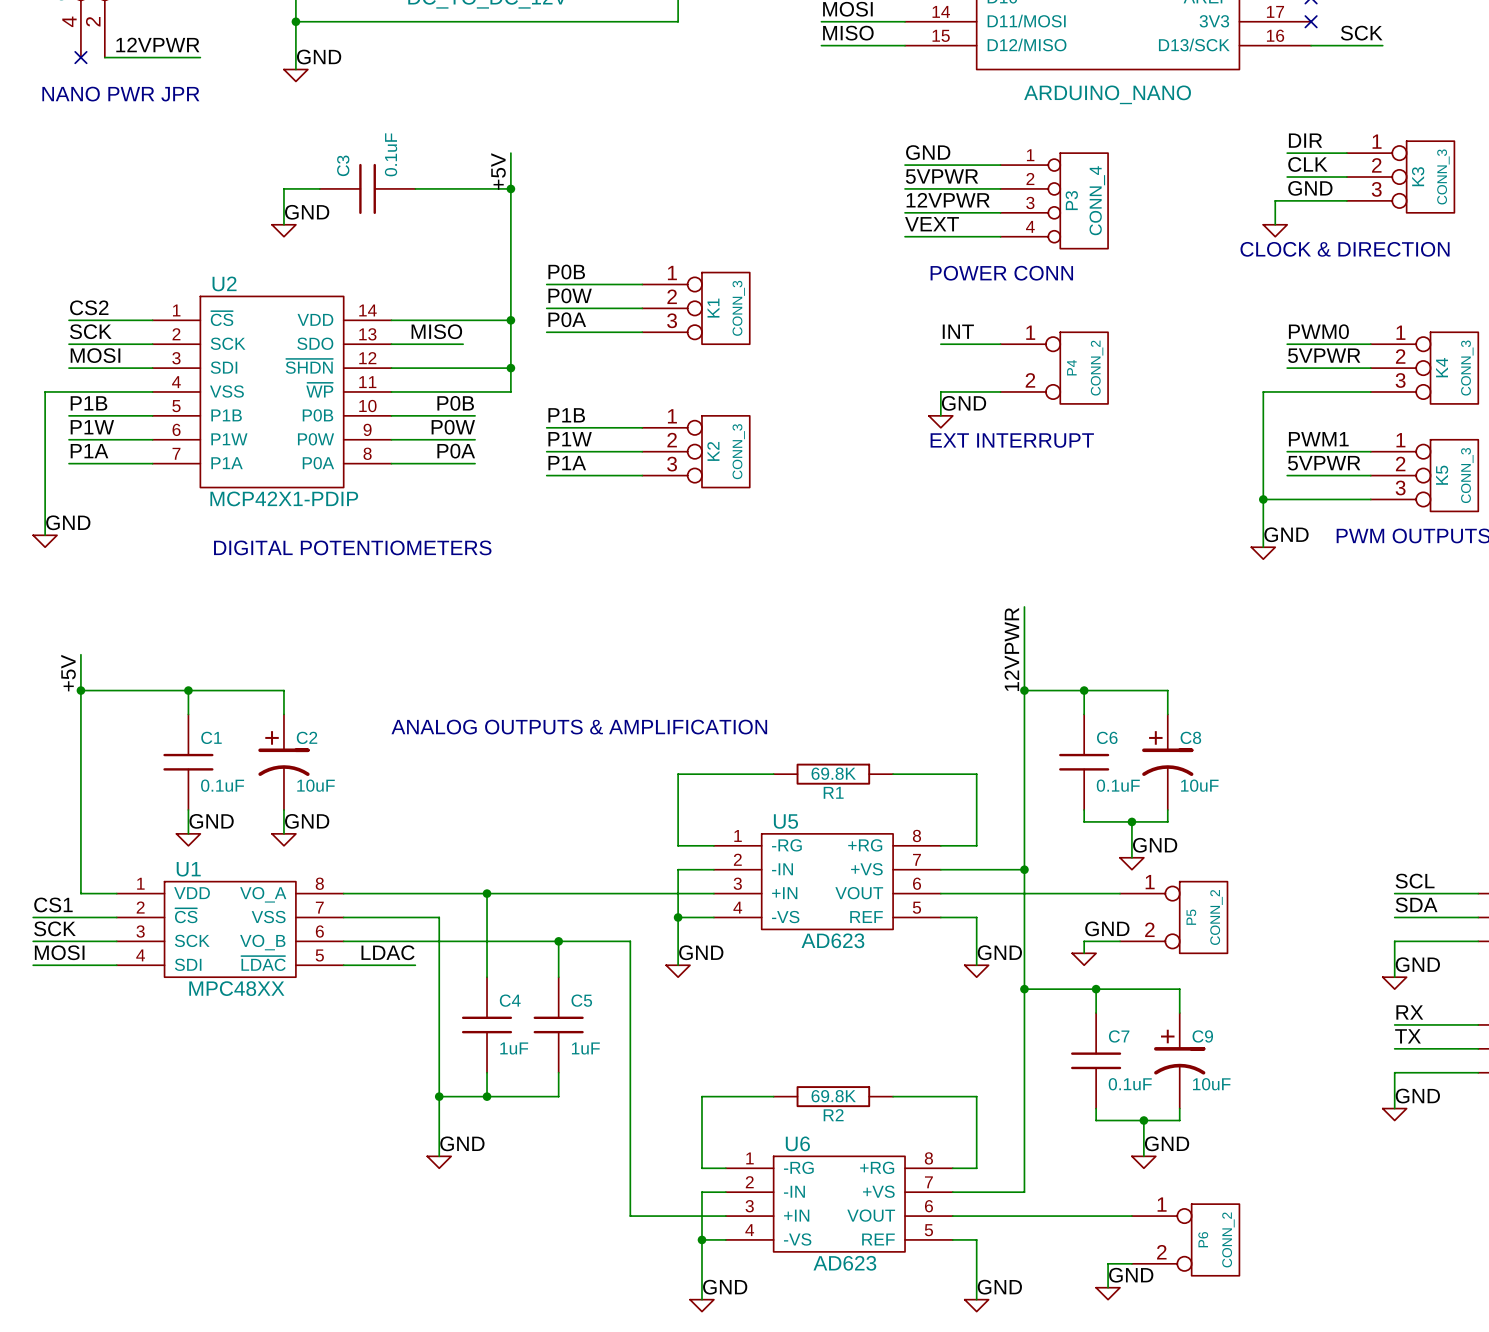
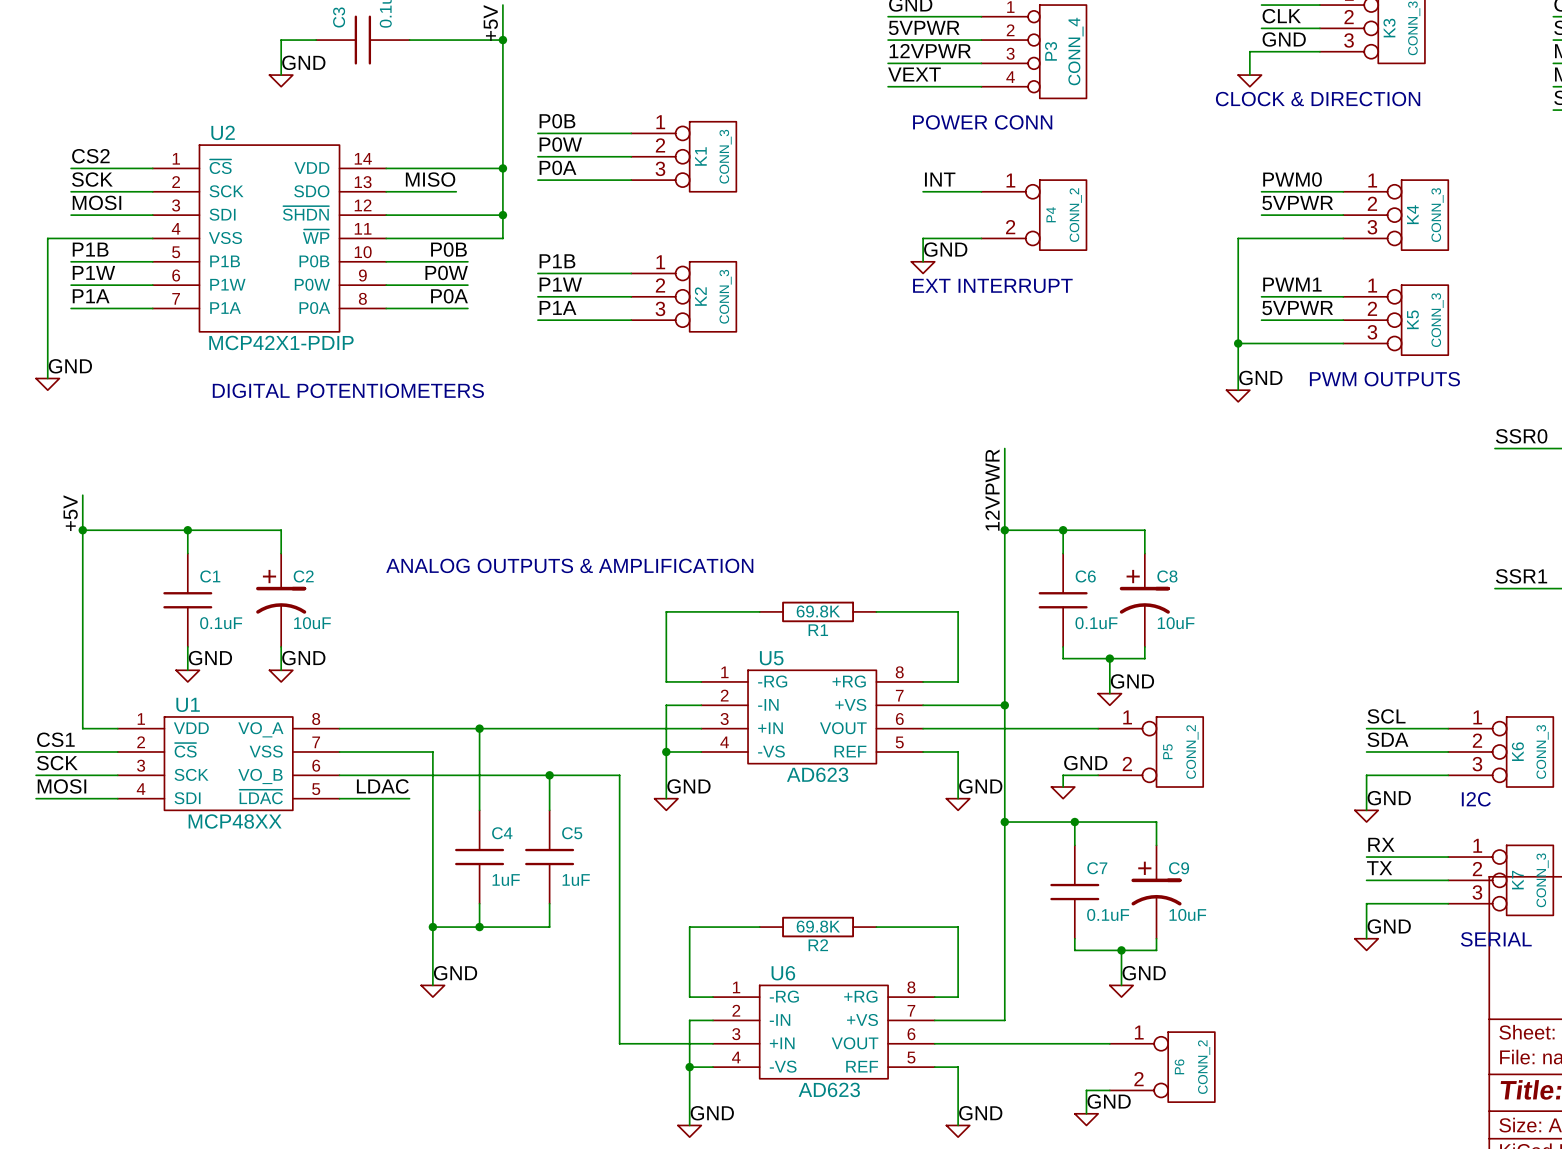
U1 value: MPC48XX (236, 988) -> MCP48XX (235, 821)

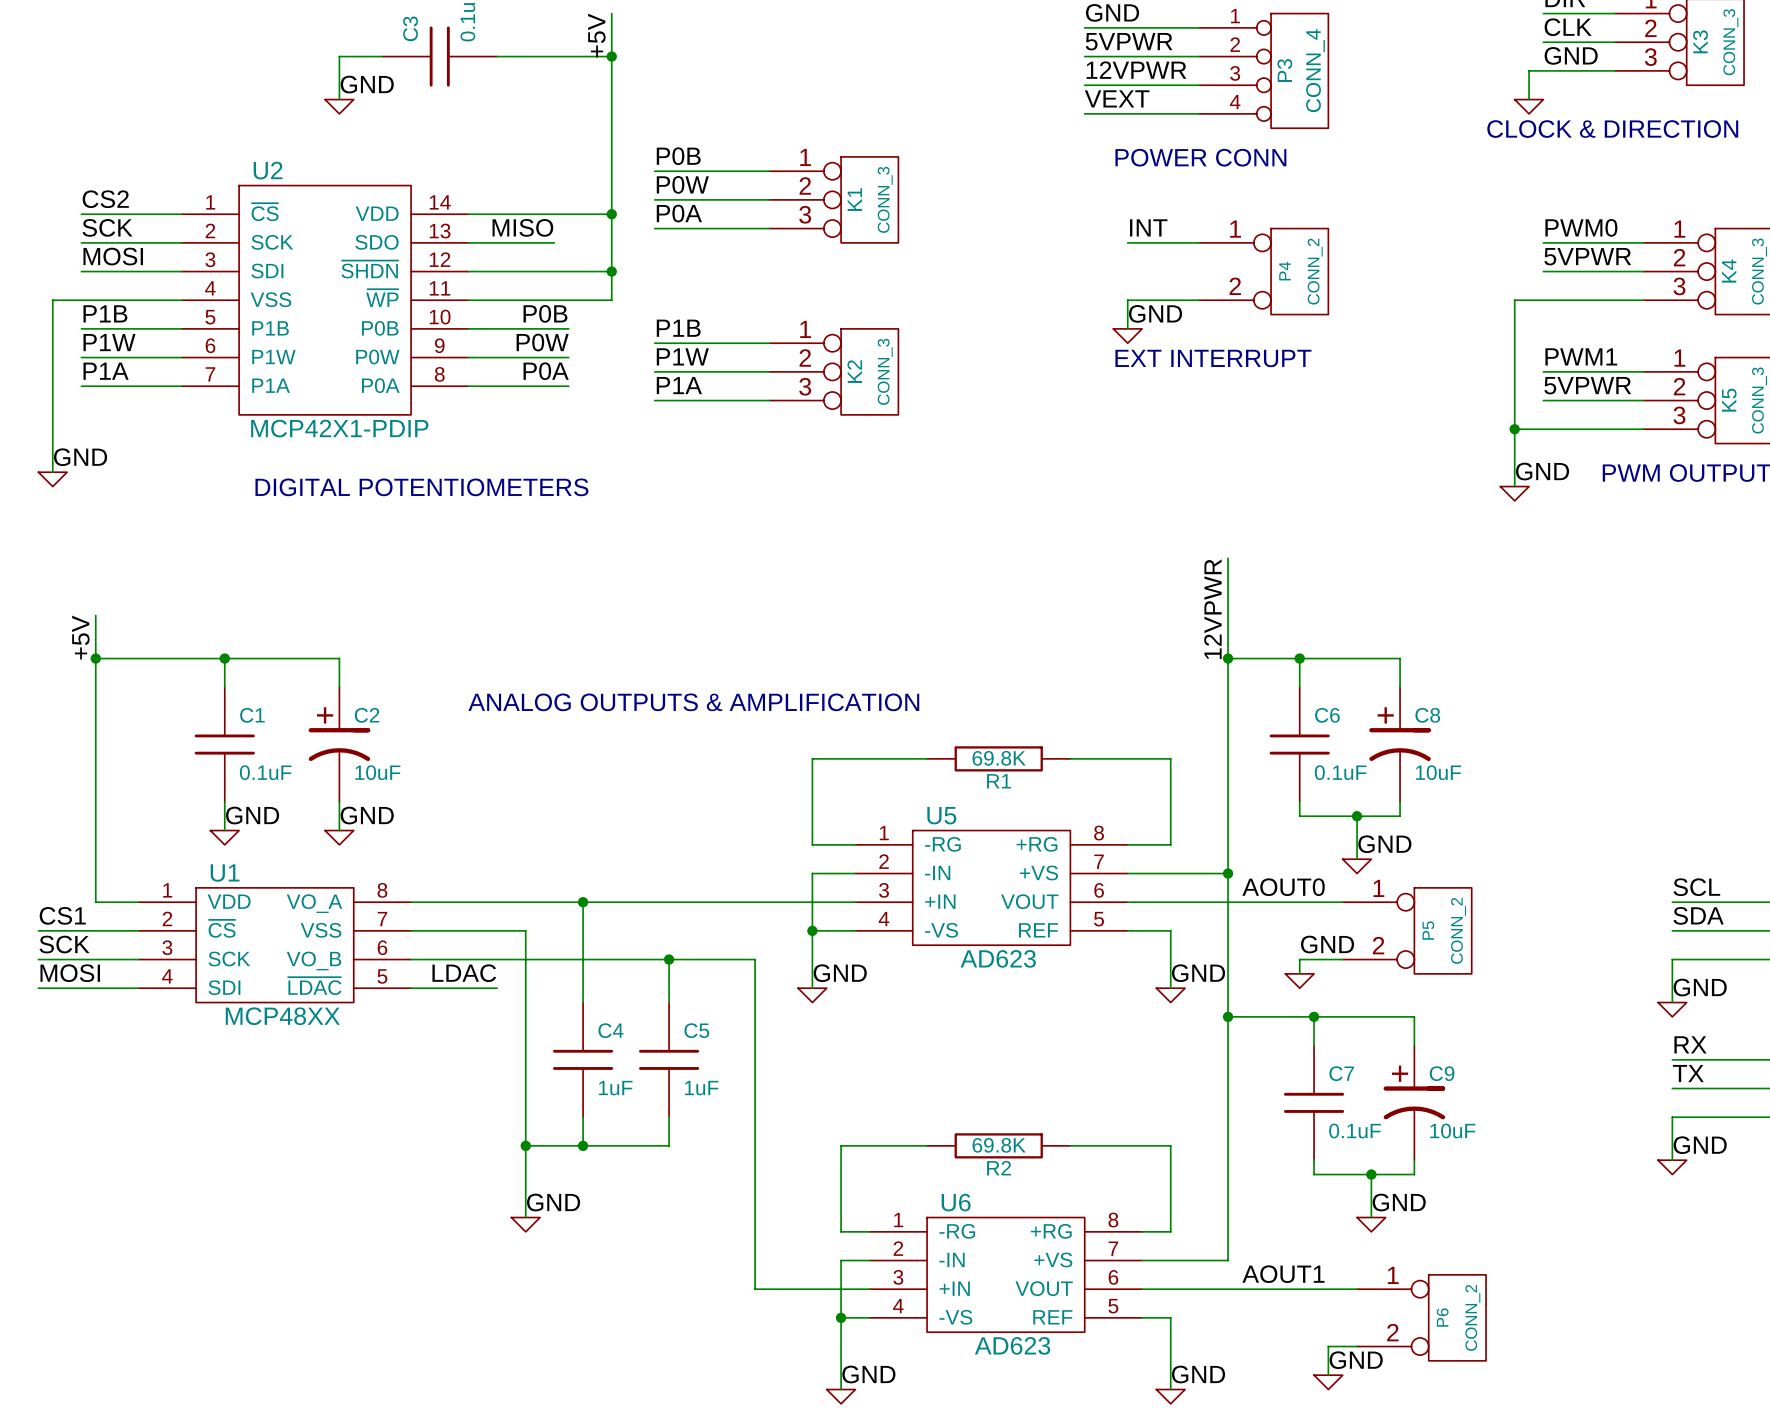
label: none -> AOUT0 (1283, 887)
label: none -> AOUT1 (1283, 1274)

